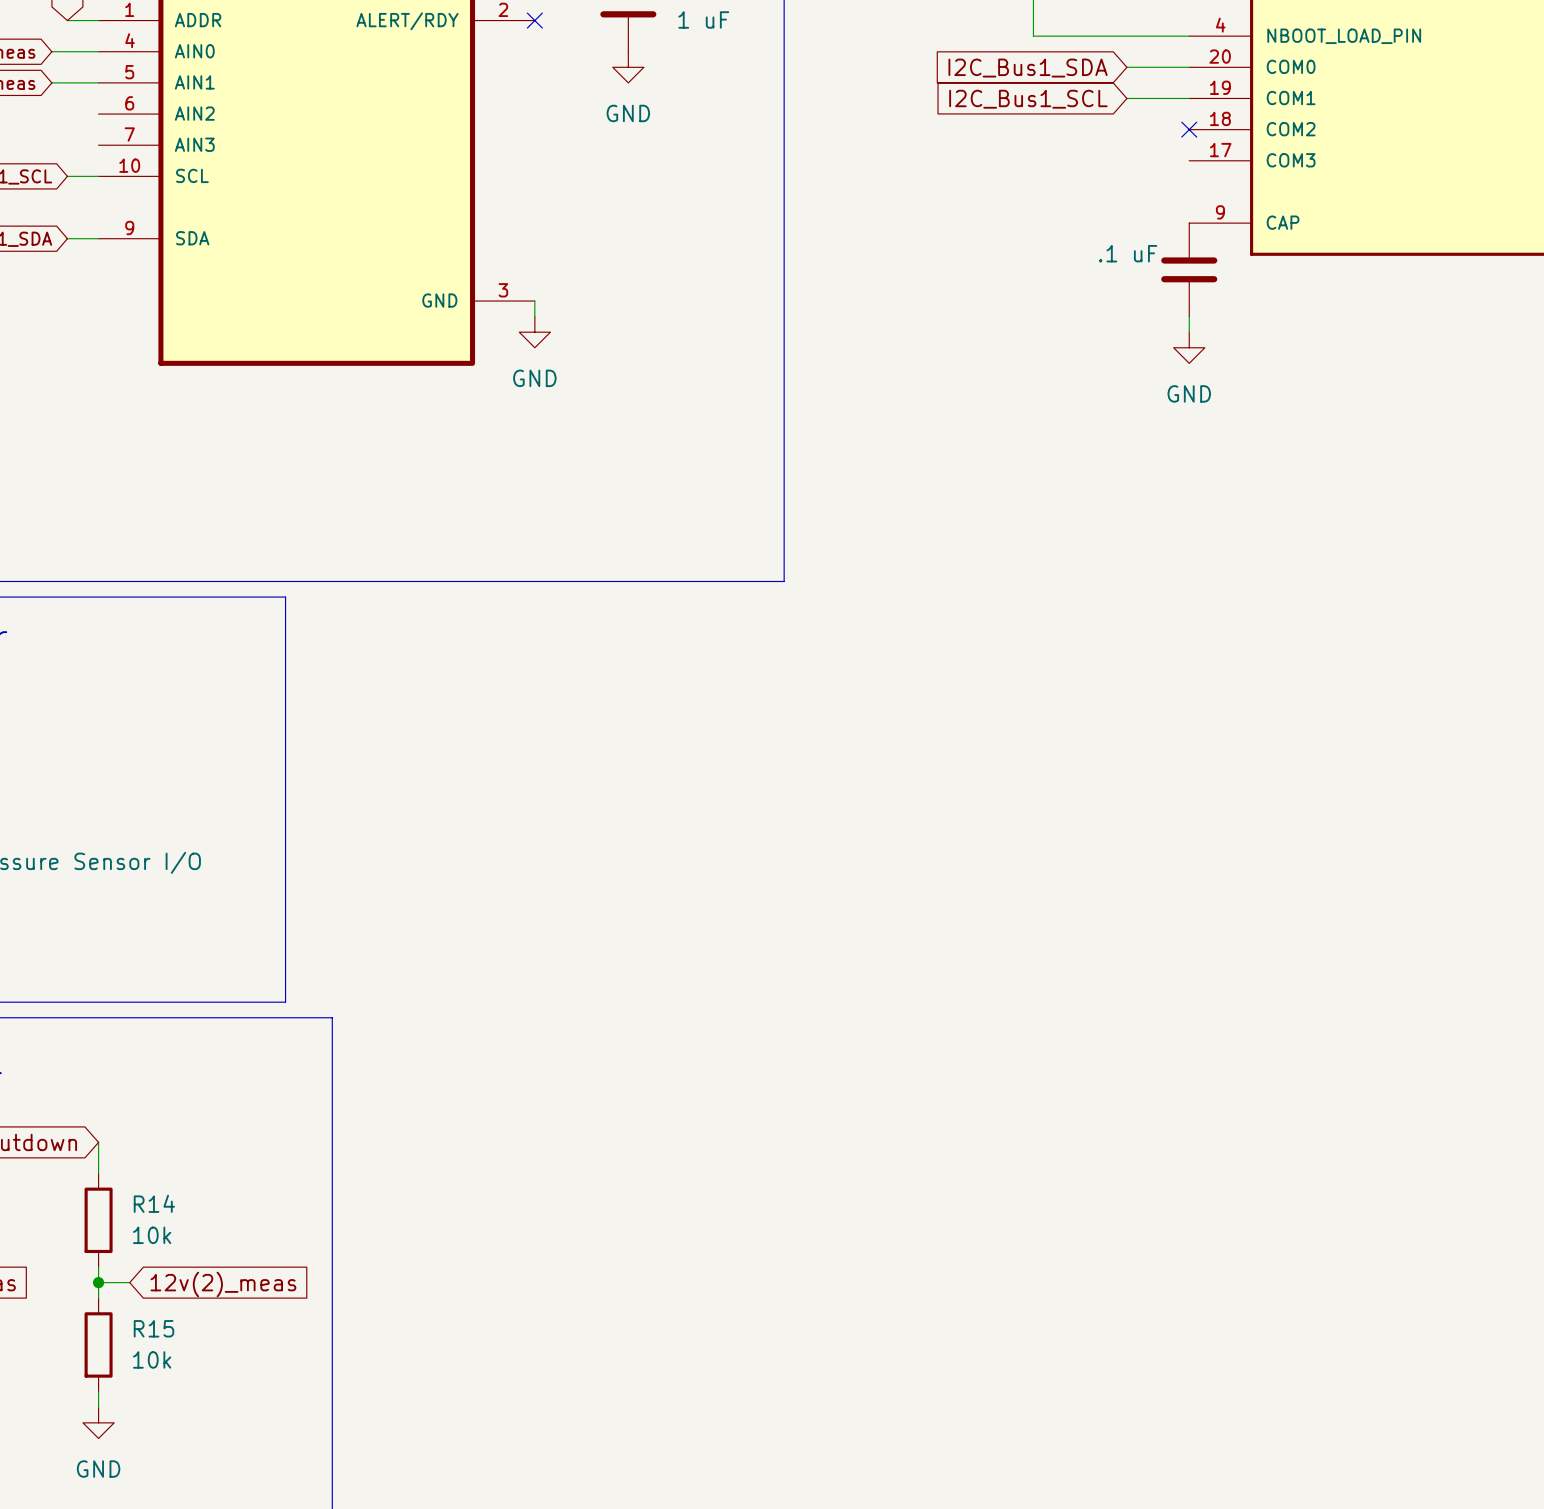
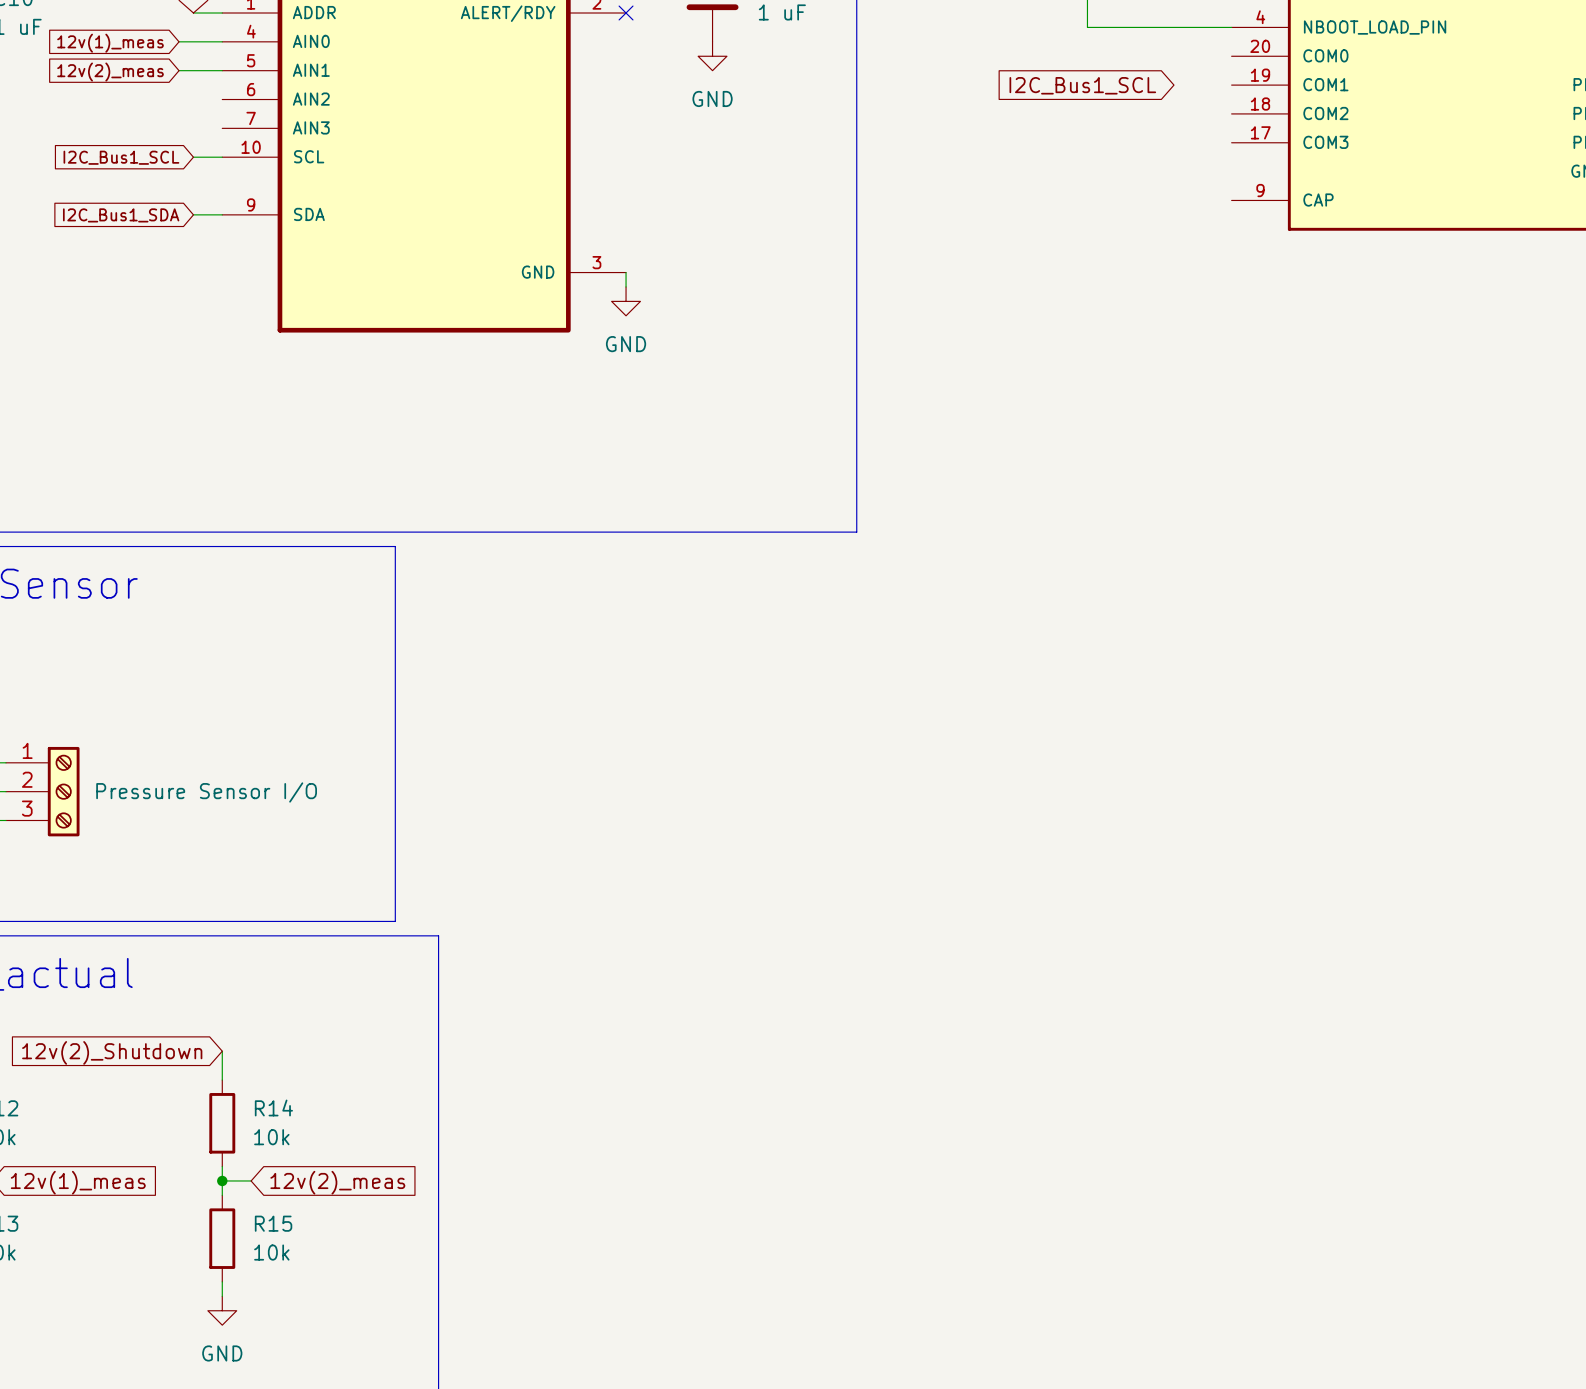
wire: (1126, 67) (1189, 67) -> none
global label: I2C_Bus1_SDA (1028, 68) -> none
wire: (1126, 98) (1189, 98) -> none
no-connect mark: (1189, 129) -> none
part: .1 uF (1189, 269) -> none
wire: (1189, 316) (1189, 332) -> none
power symbol: GND (1189, 347) -> none

